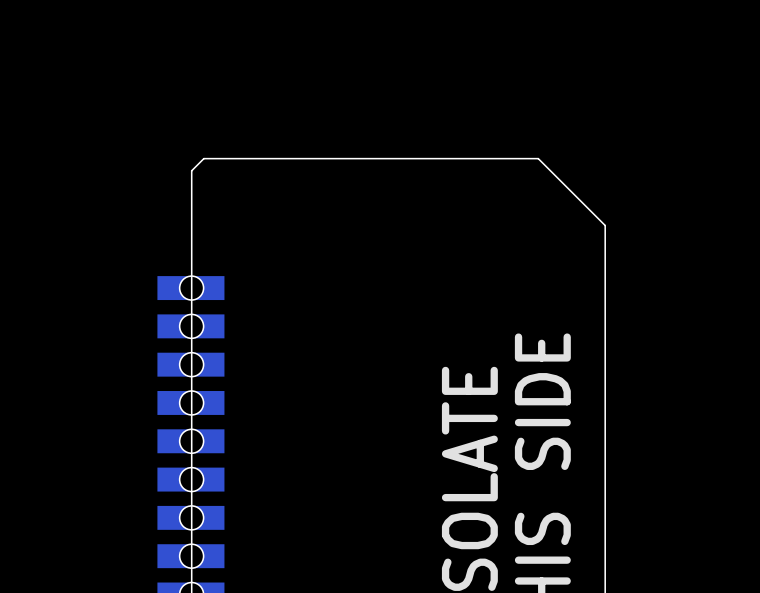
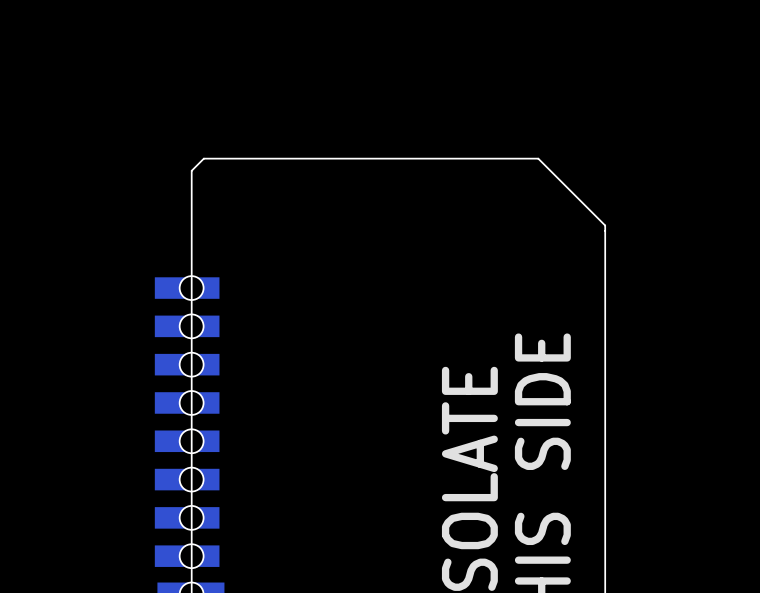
part footprint: [157, 276, 225, 301] -> [154, 277, 220, 299]
part footprint: [157, 314, 225, 339] -> [154, 315, 220, 338]
part footprint: [157, 352, 225, 377] -> [154, 353, 220, 376]
part footprint: [157, 391, 225, 415] -> [154, 392, 220, 414]
part footprint: [157, 429, 225, 454] -> [154, 430, 220, 453]
part footprint: [157, 467, 225, 492] -> [154, 468, 220, 491]
part footprint: [157, 505, 225, 530] -> [154, 507, 220, 529]
part footprint: [157, 544, 225, 569] -> [154, 545, 220, 567]

